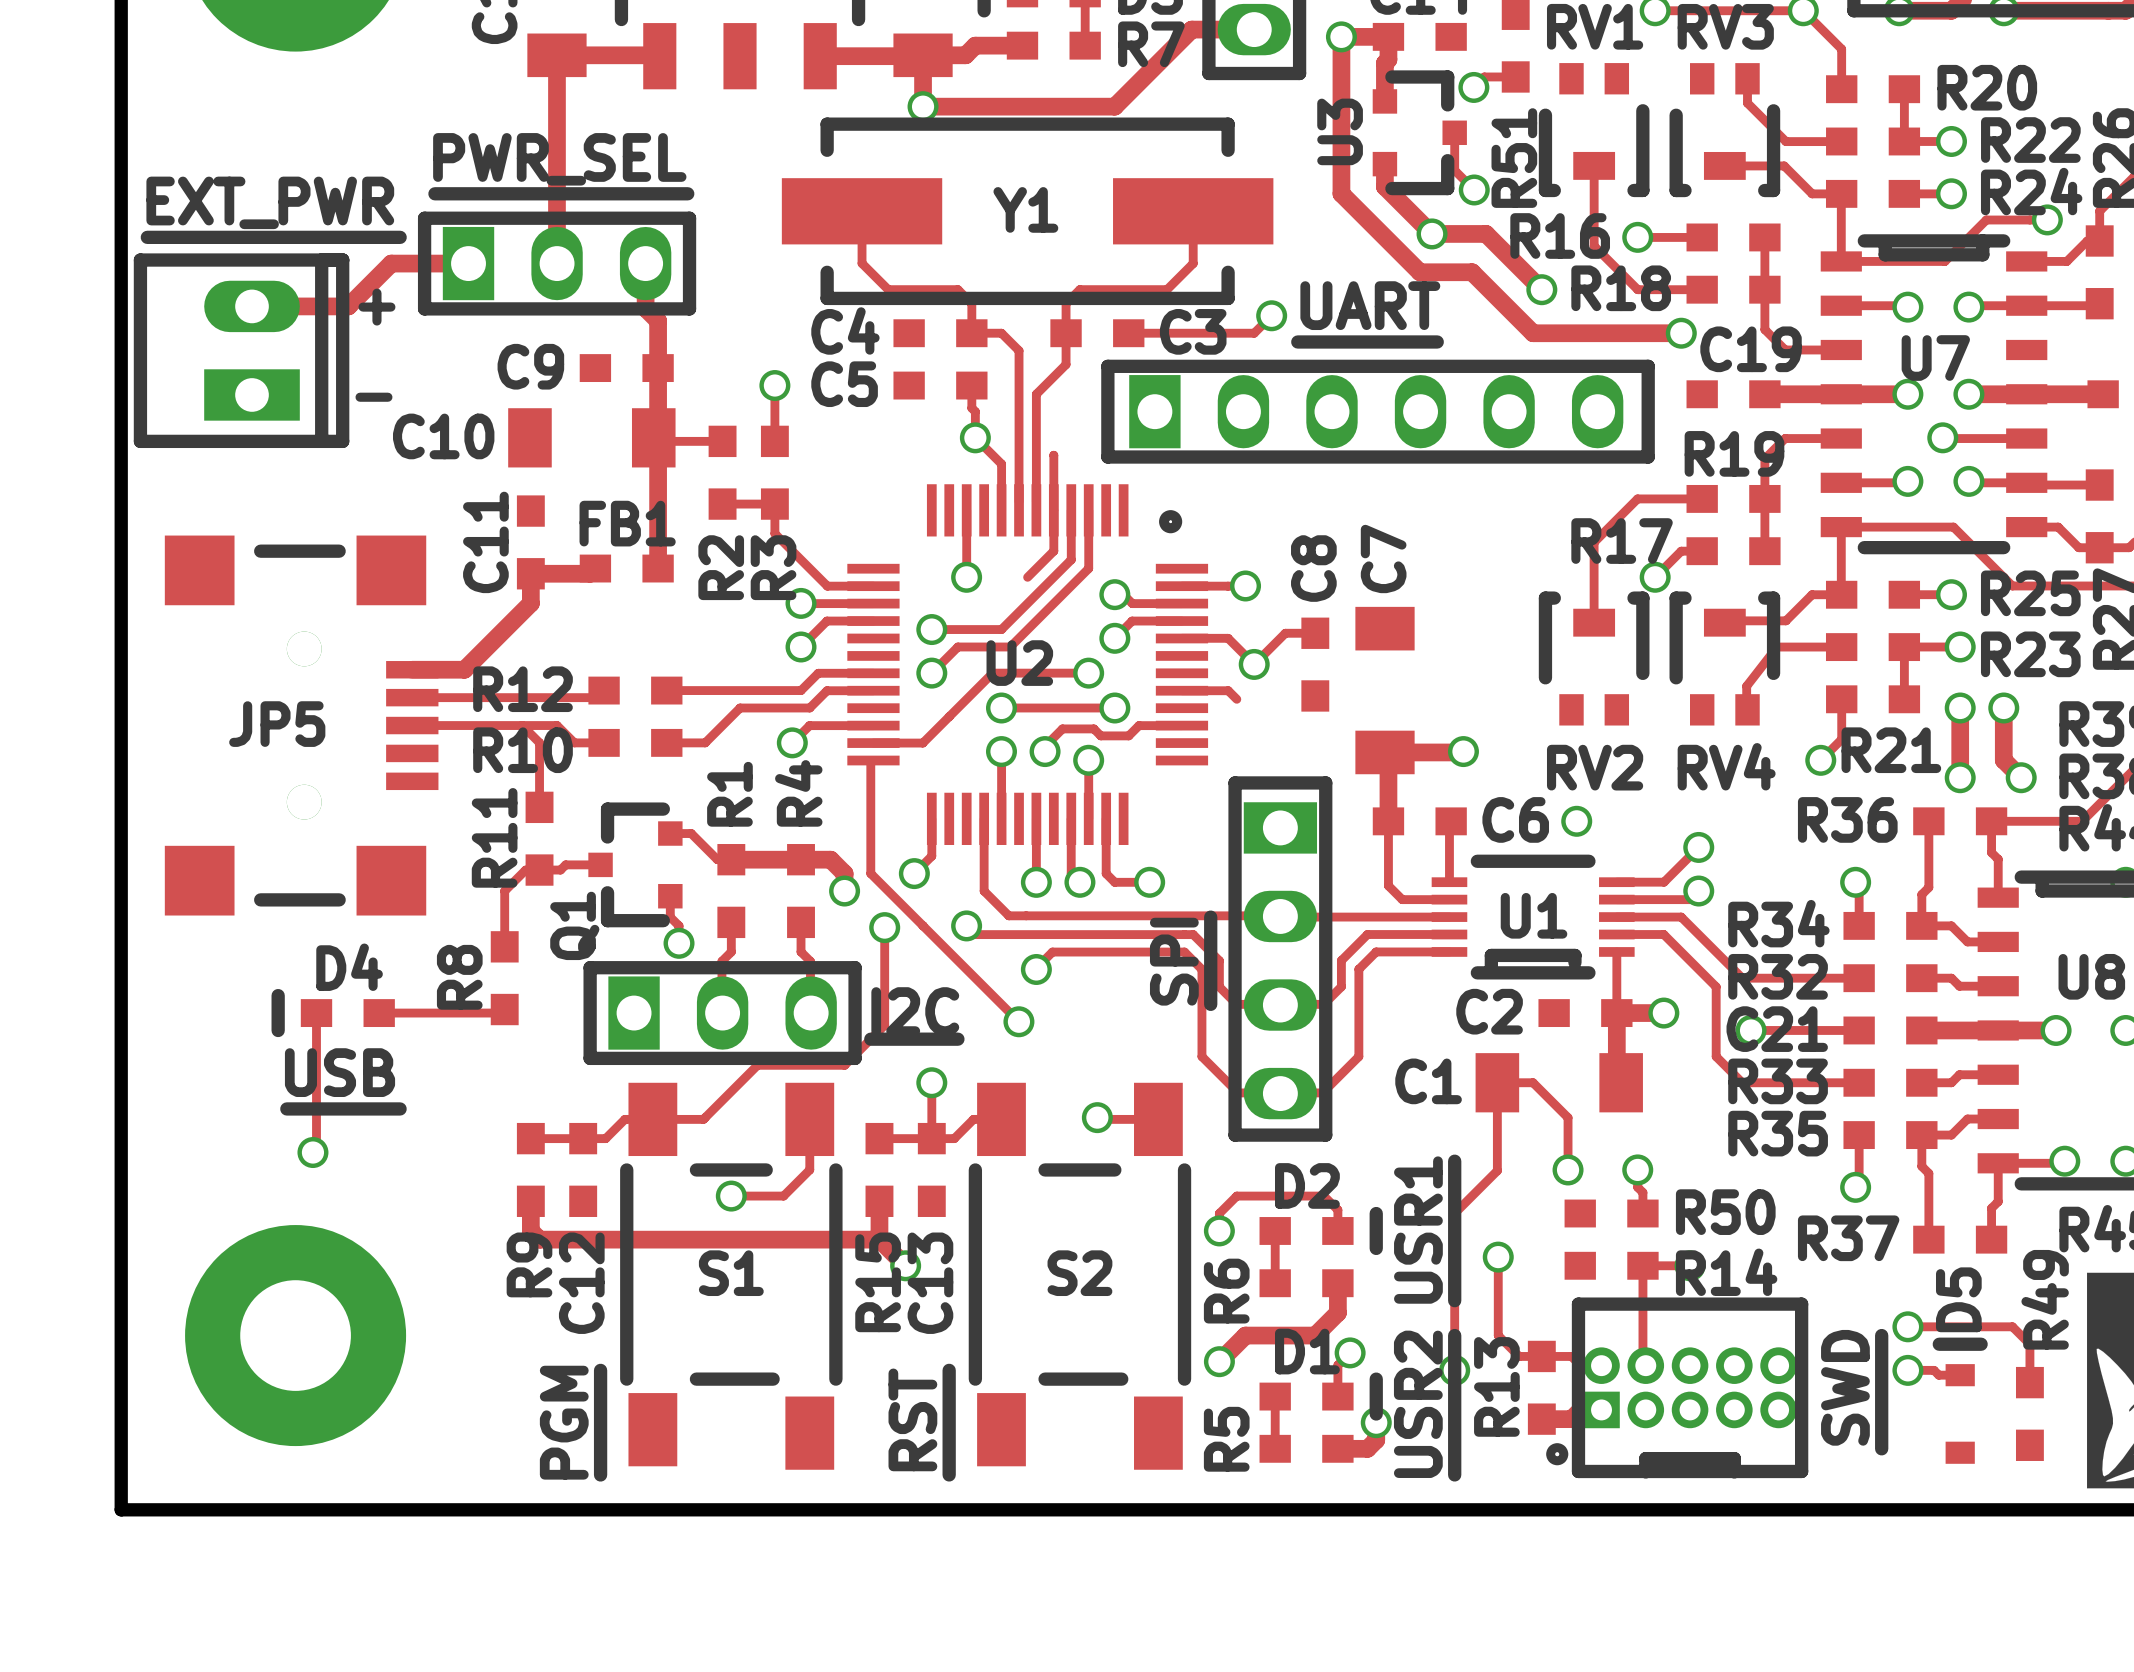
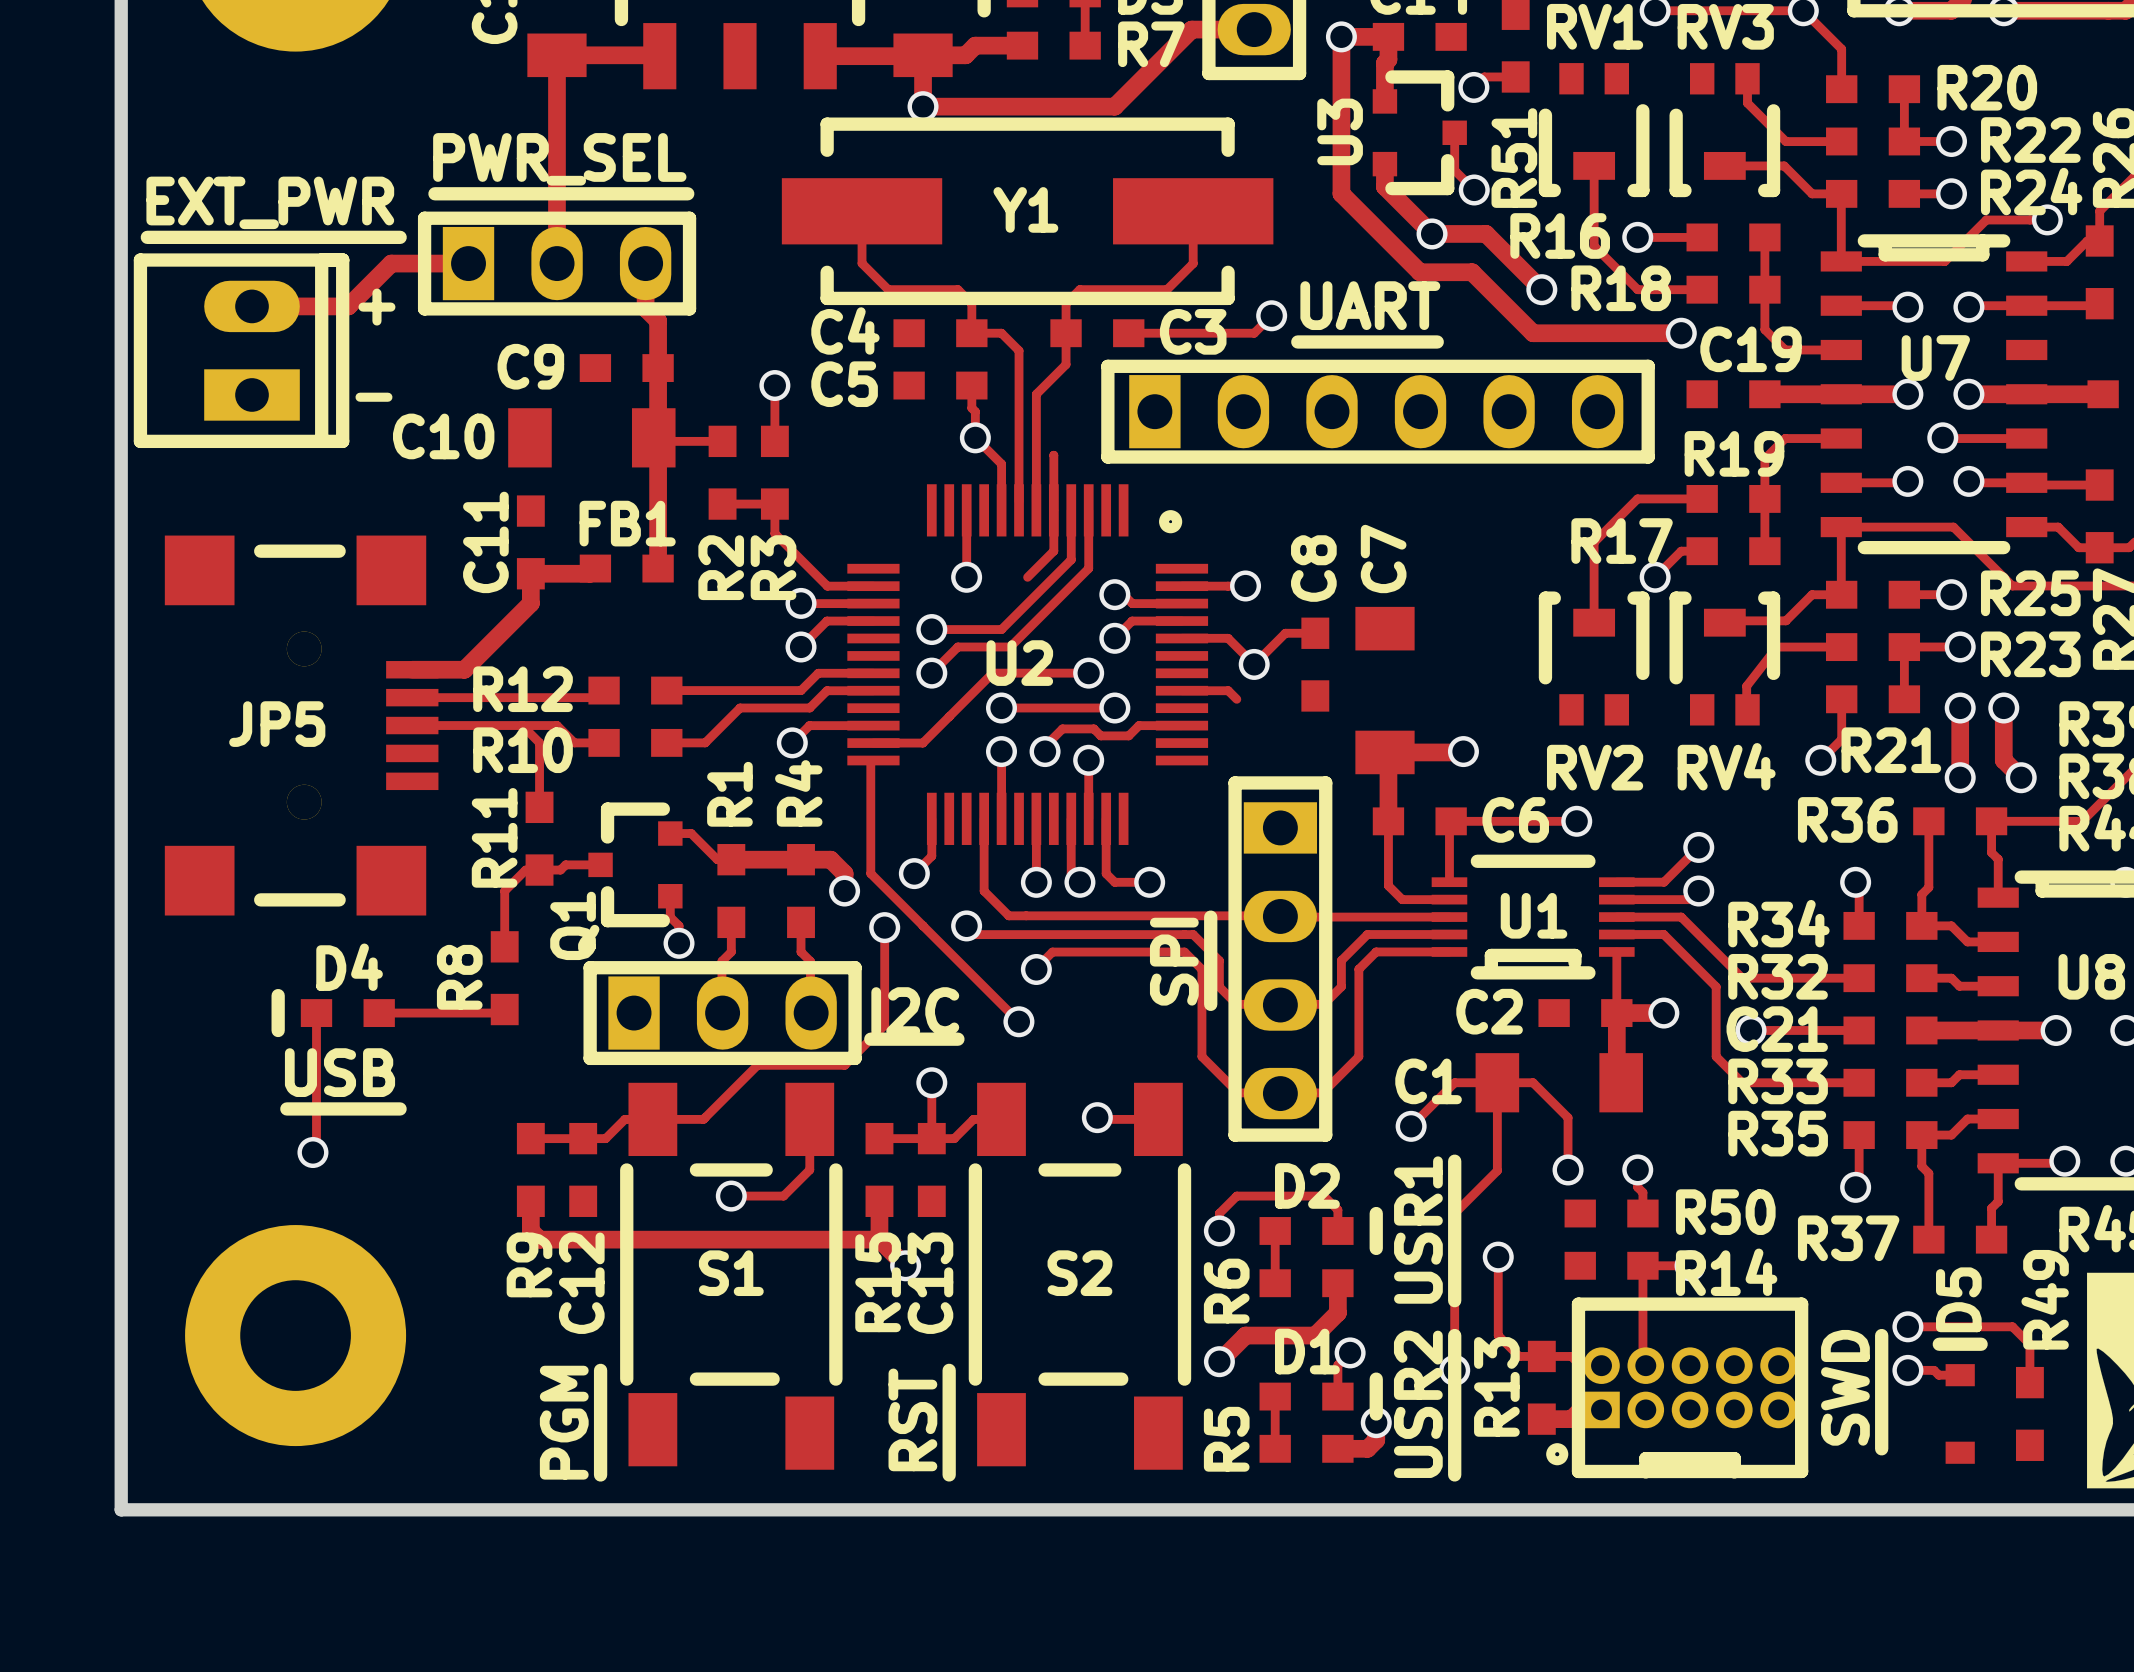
track: none -> (1578, 819) (1576, 821) (1451, 821)
track: none -> (1497, 1082) (1454, 1082) (1411, 1126)
via: none -> (1411, 1126)

